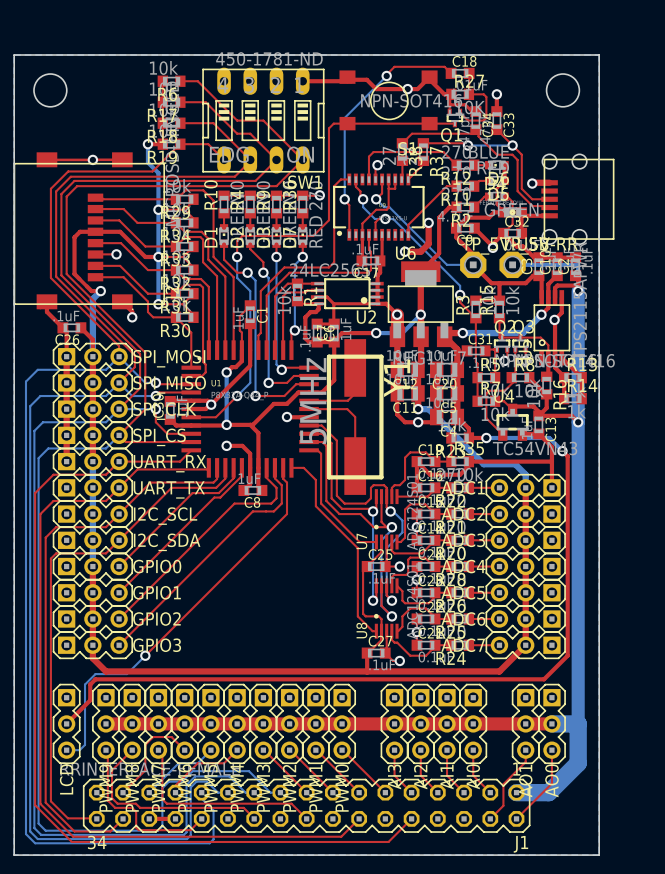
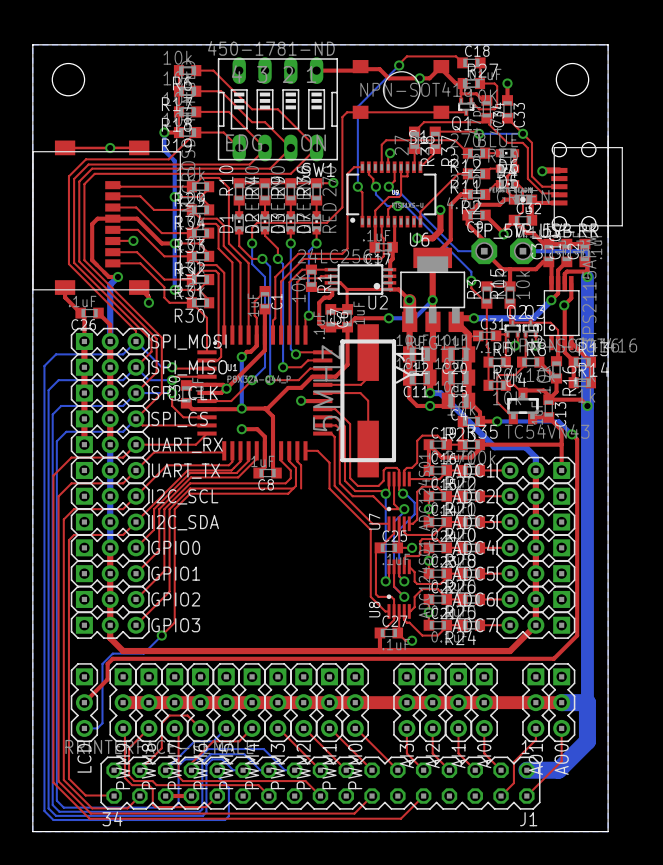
top track: (221, 490) (218, 493) (192, 493) (174, 511) -> (267, 493) (190, 493)
top track: (222, 494) (220, 497) (214, 497) (142, 569) -> (238, 477) (190, 477) (159, 509) (159, 550)
top track: (276, 495) (271, 503) (234, 503) (147, 590) -> (290, 478) (285, 483) (190, 483) (164, 509) (164, 571)
top track: (287, 506) (287, 514) (158, 642) -> (174, 509) (174, 622)
top track: (252, 511) (153, 611) -> (293, 488) (190, 488) (169, 509) (169, 591)
top track: (158, 527) (137, 548) -> (236, 473) (190, 473) (154, 509) (154, 529)

